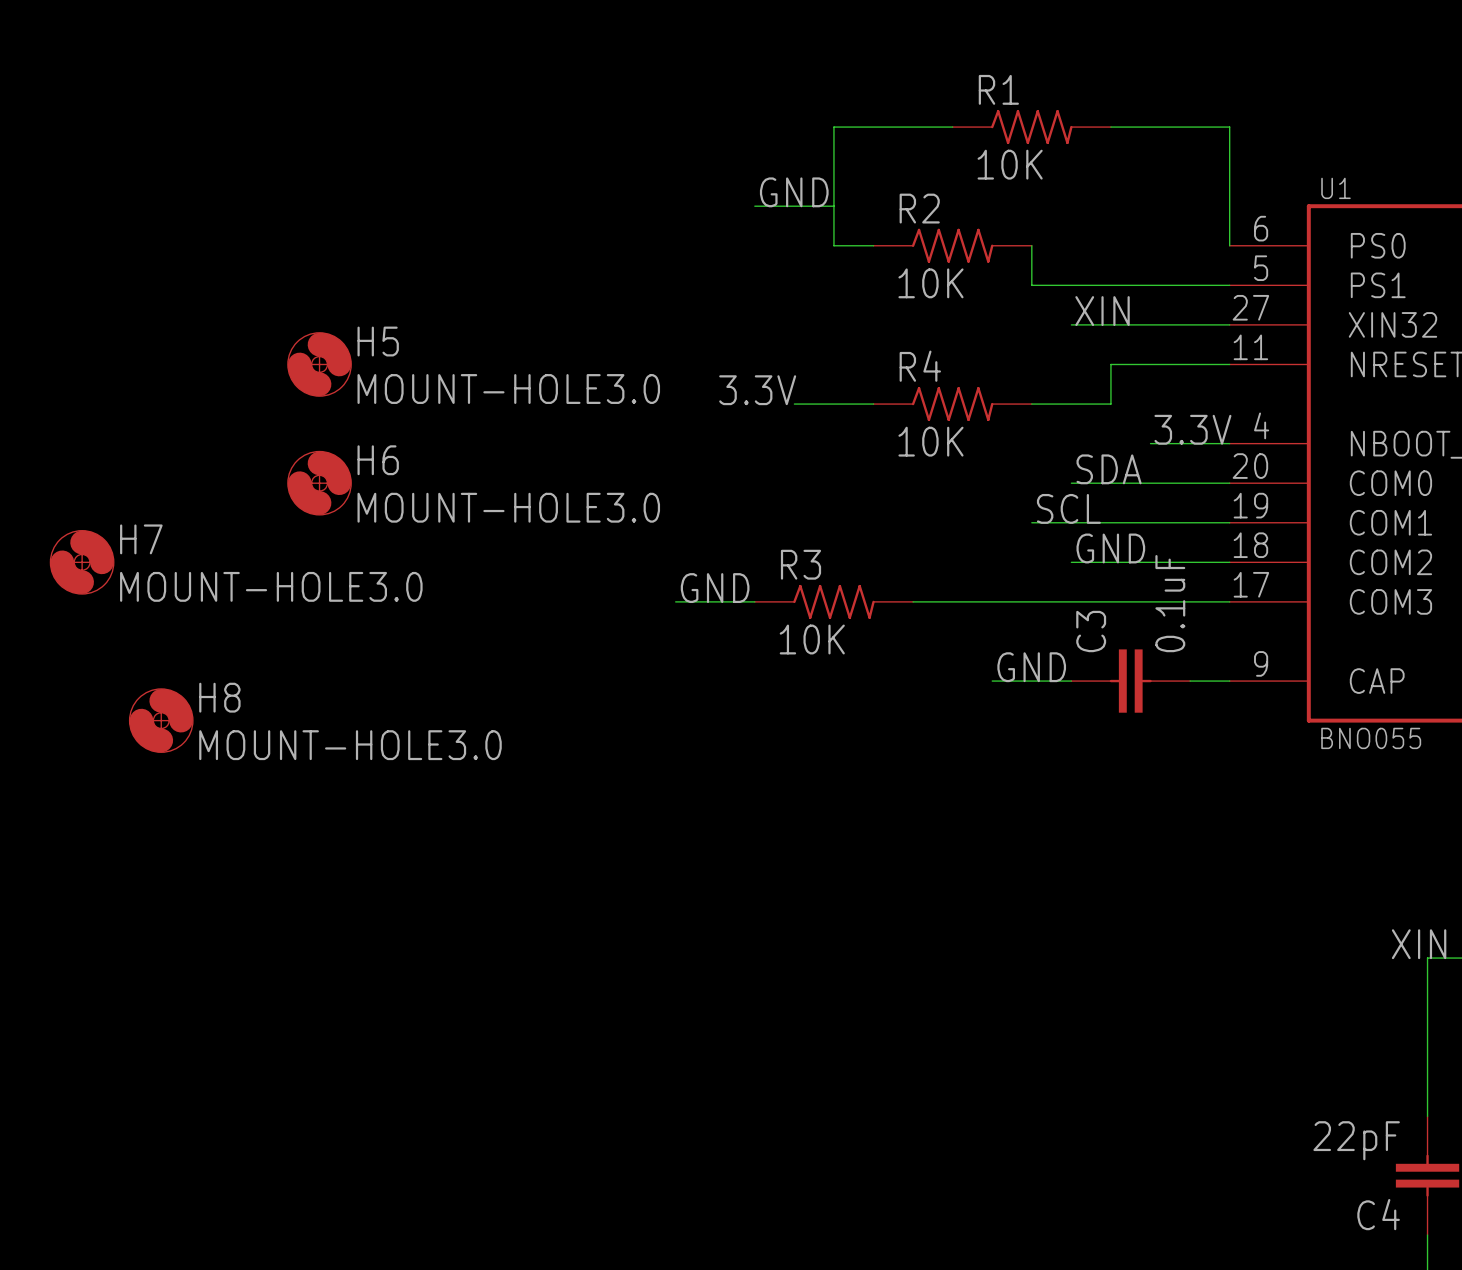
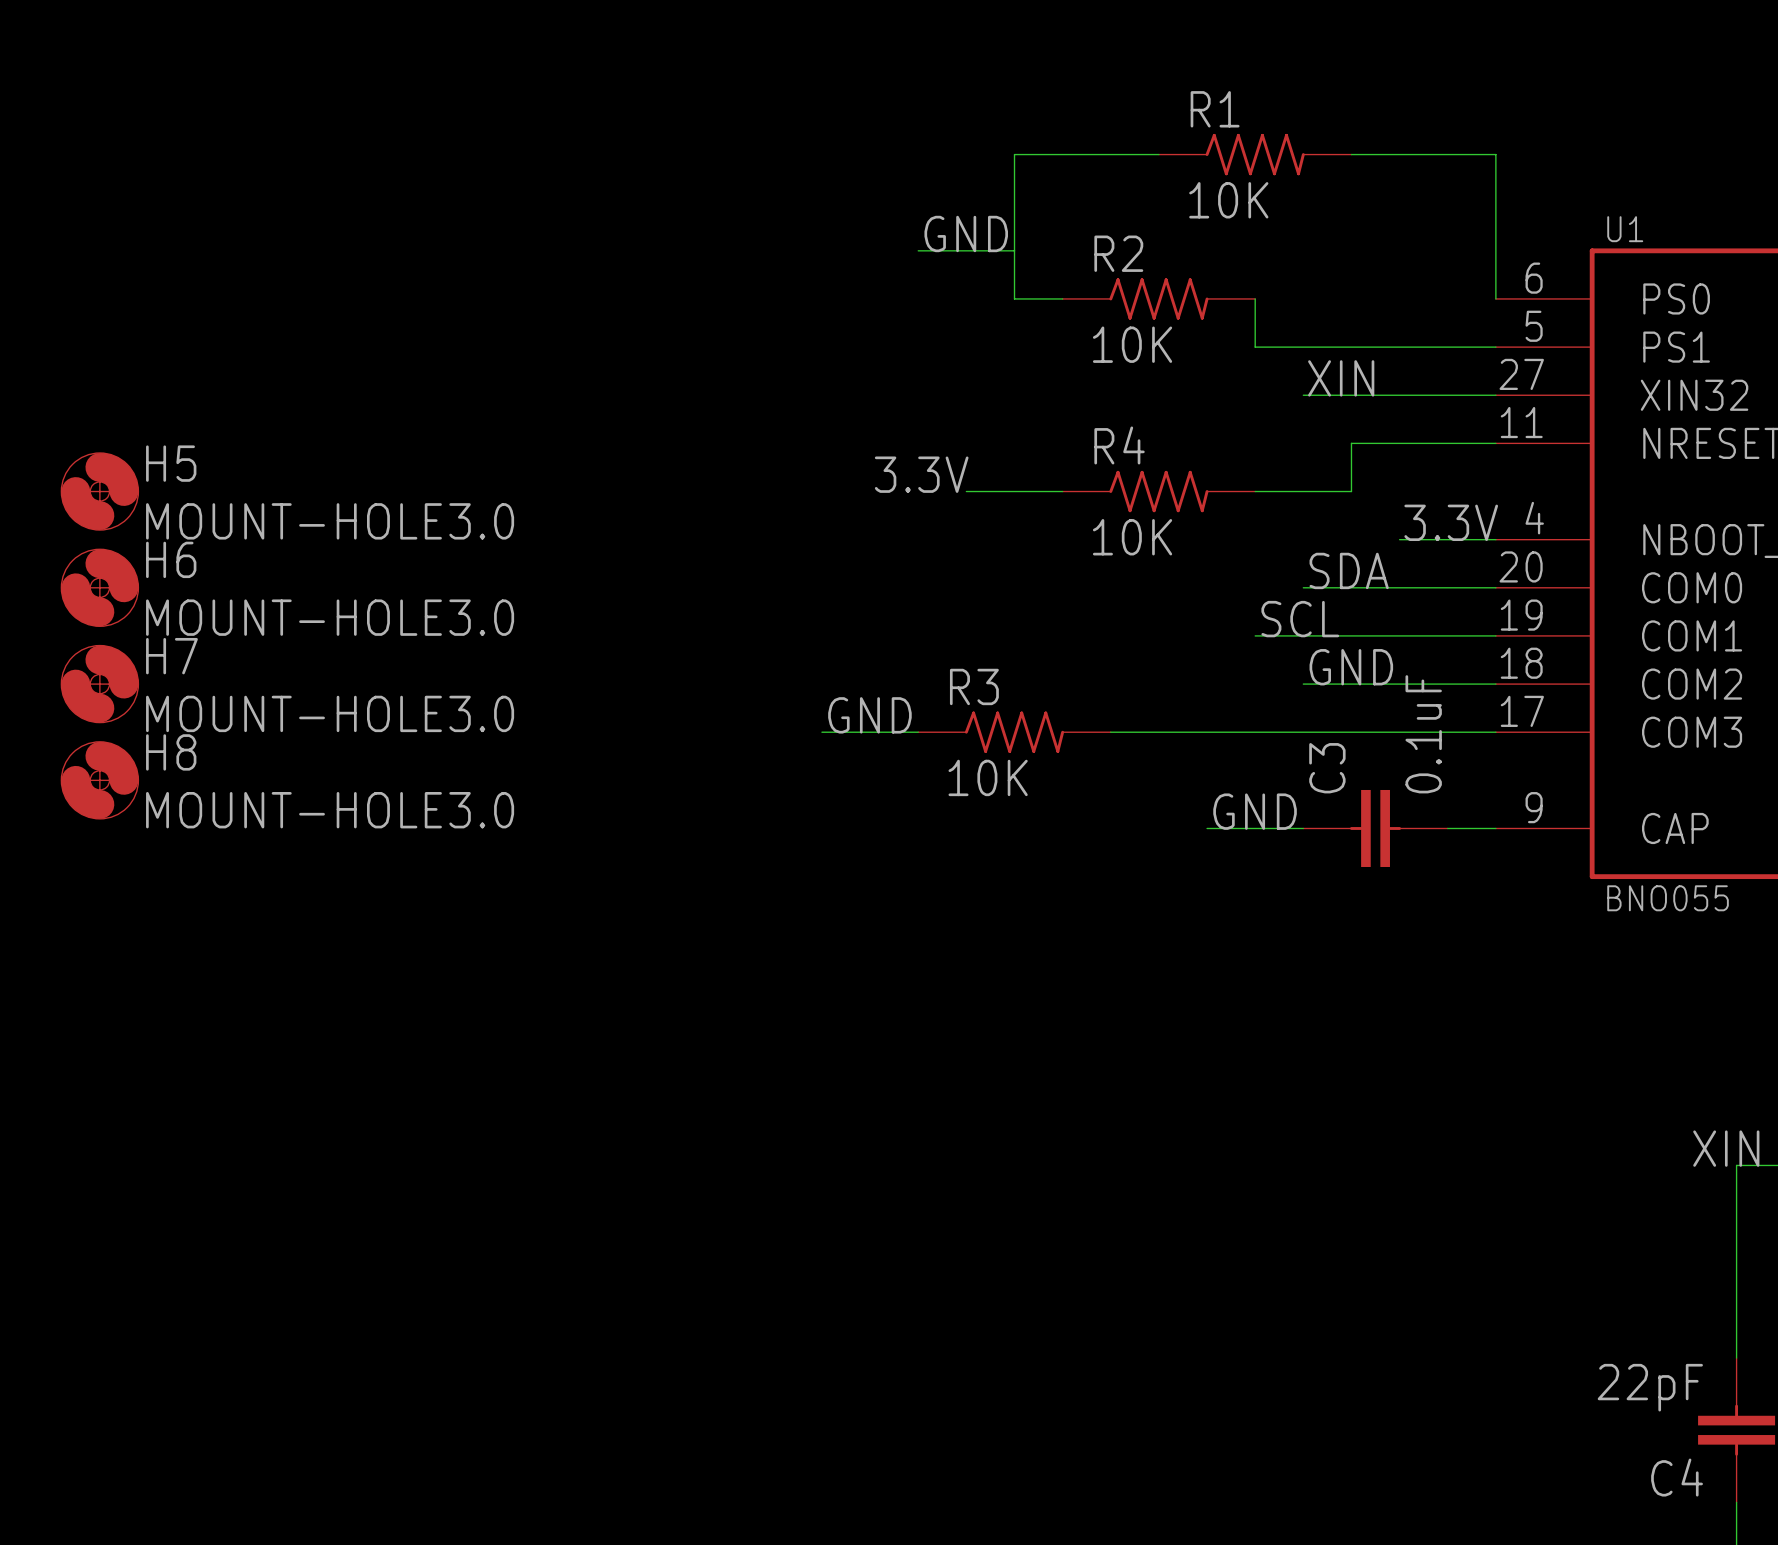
H5 position: (319, 364) -> (99, 491)
H6 position: (319, 483) -> (99, 587)
H8 position: (161, 720) -> (99, 780)

